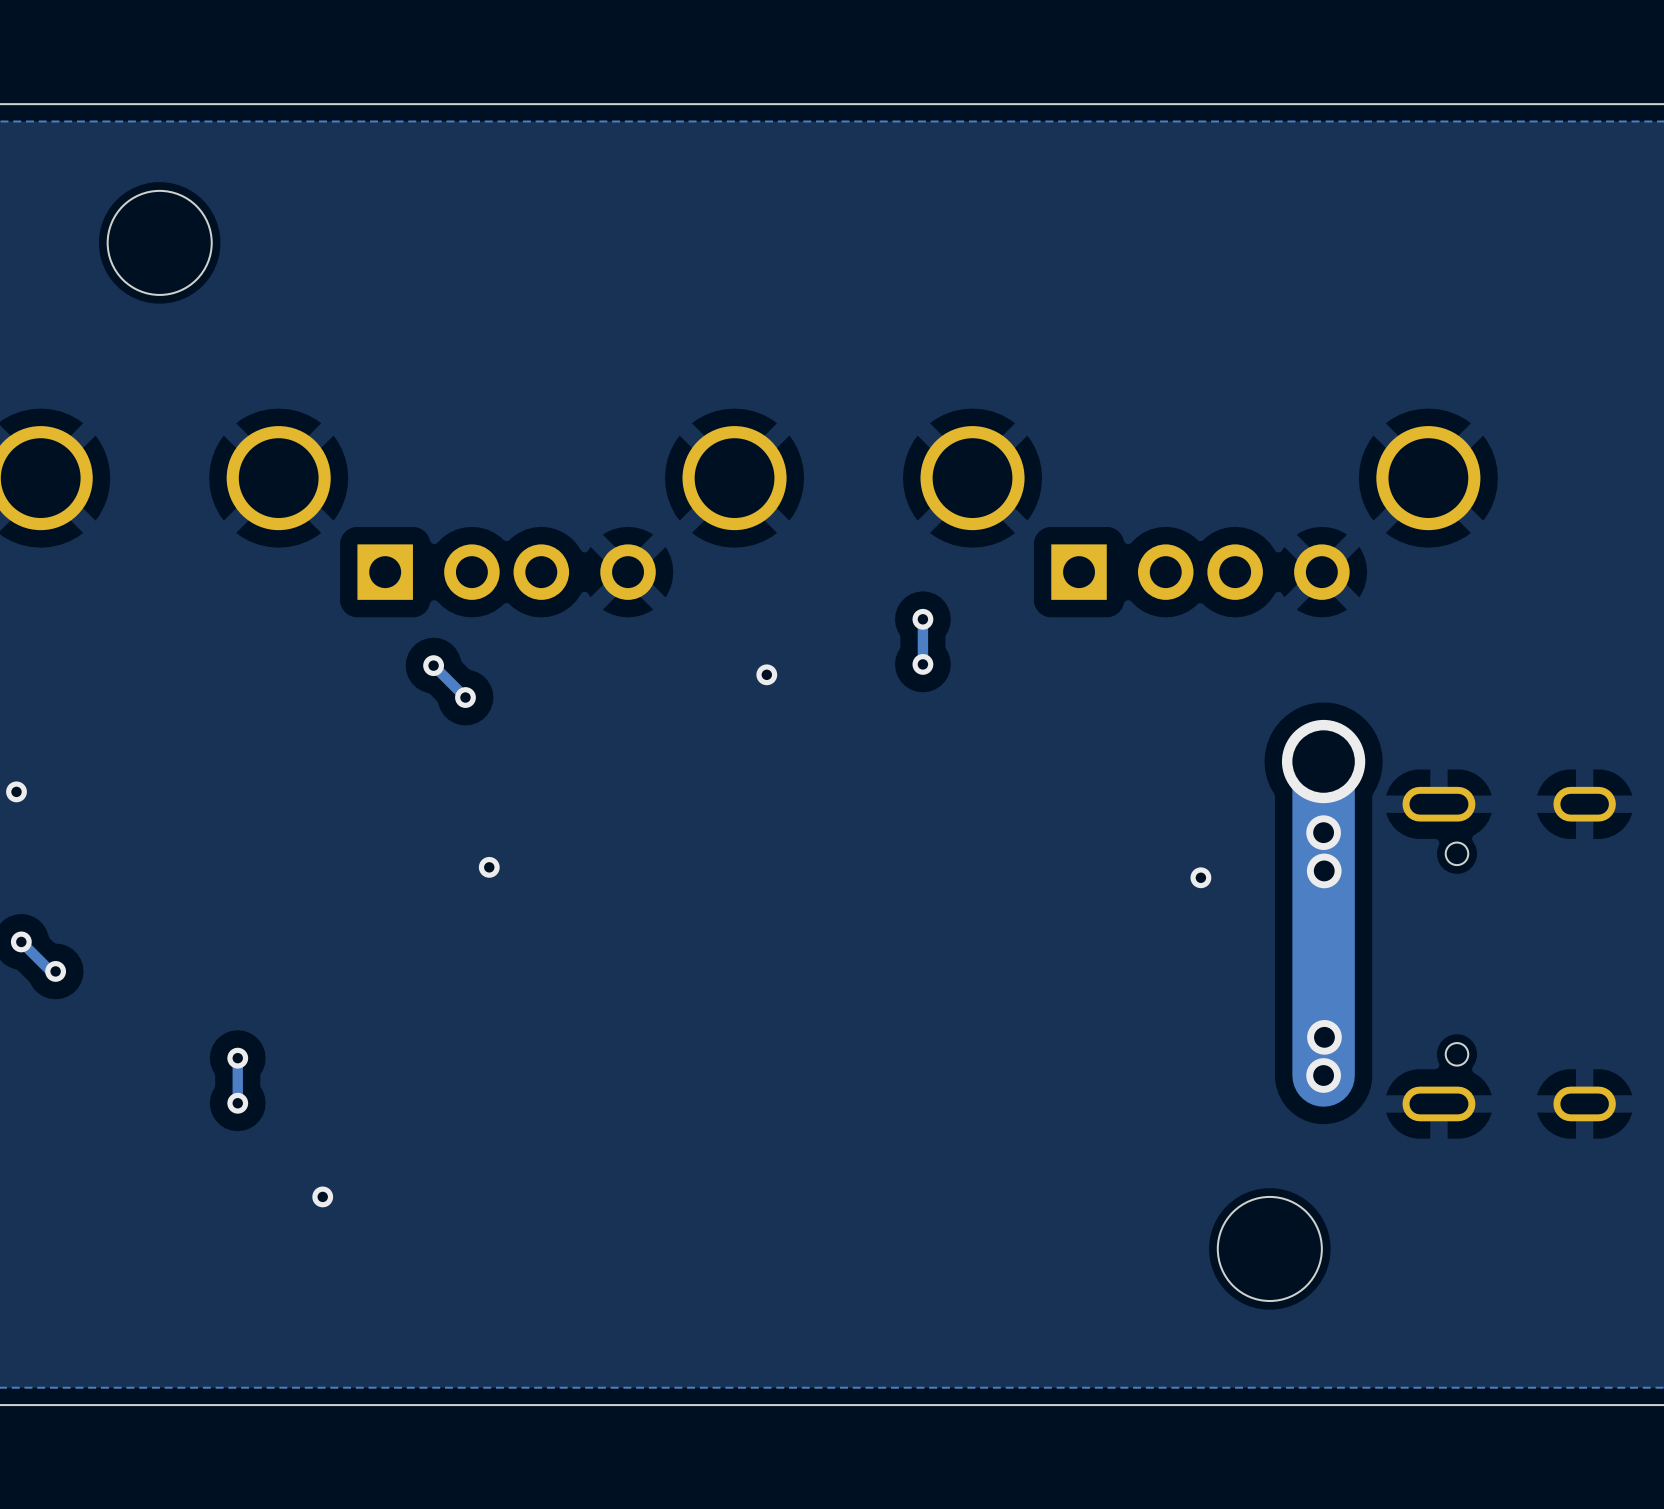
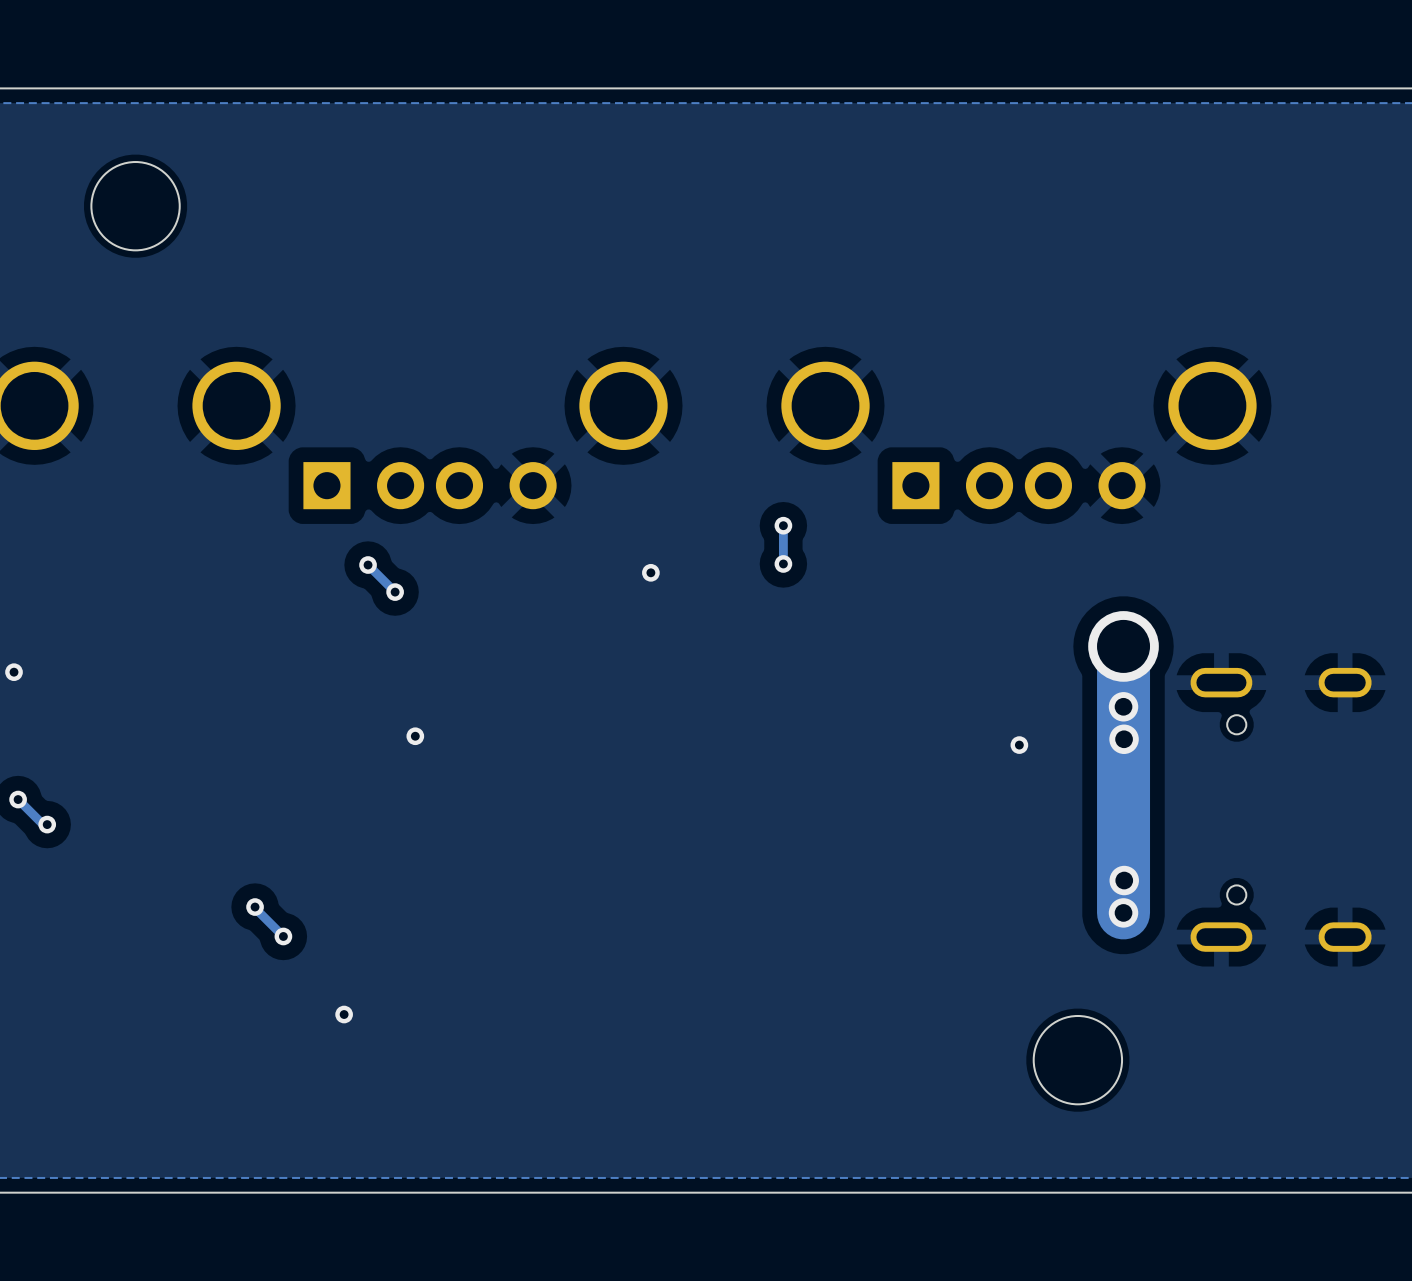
track: (237, 1058) (237, 1103) -> none
via: (237, 1058) -> none
track: none -> (255, 907) (283, 936)
via: none -> (255, 907)
via: (237, 1103) -> none
via: none -> (283, 936)
via: none -> (344, 1014)
via: (322, 1196) -> none

